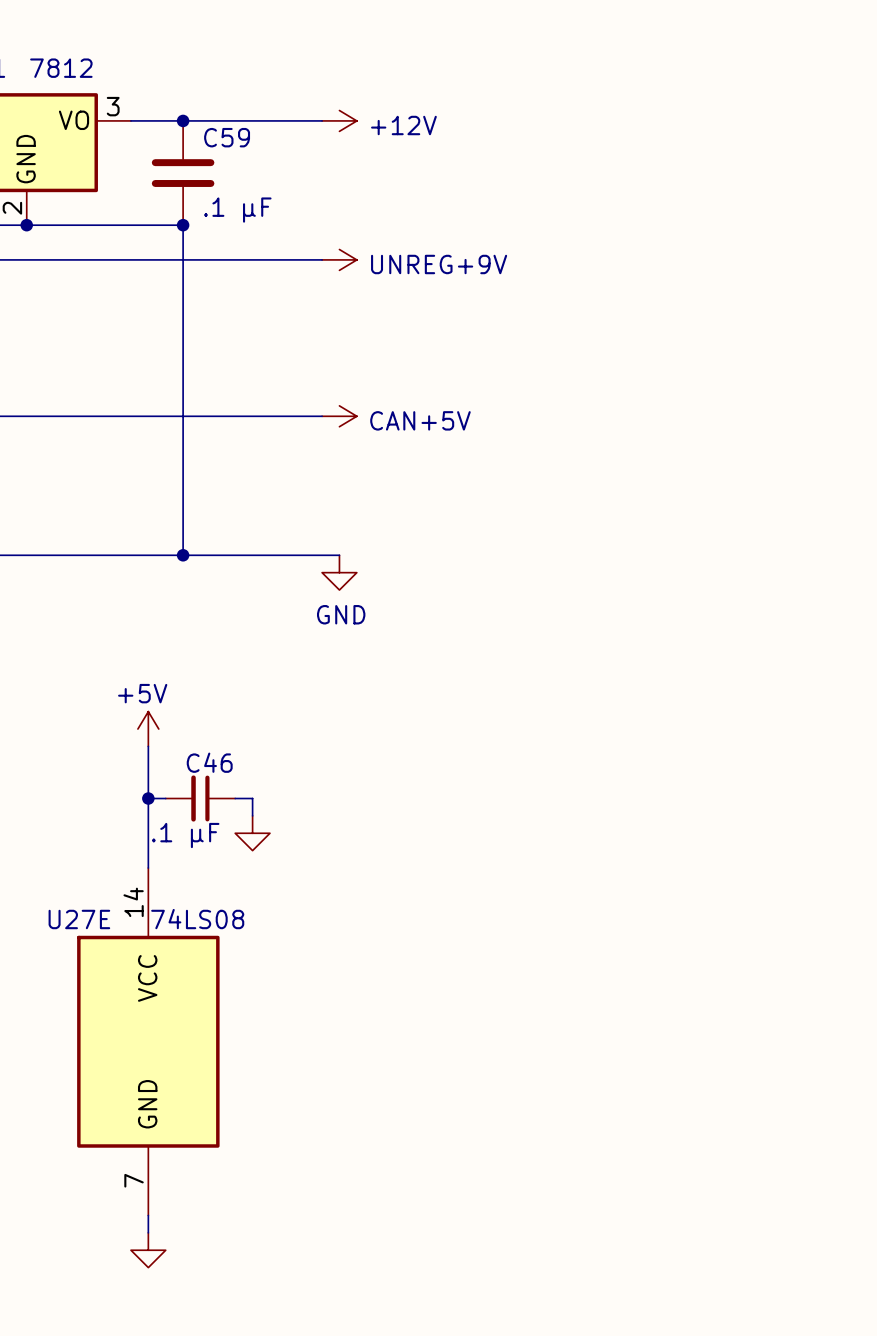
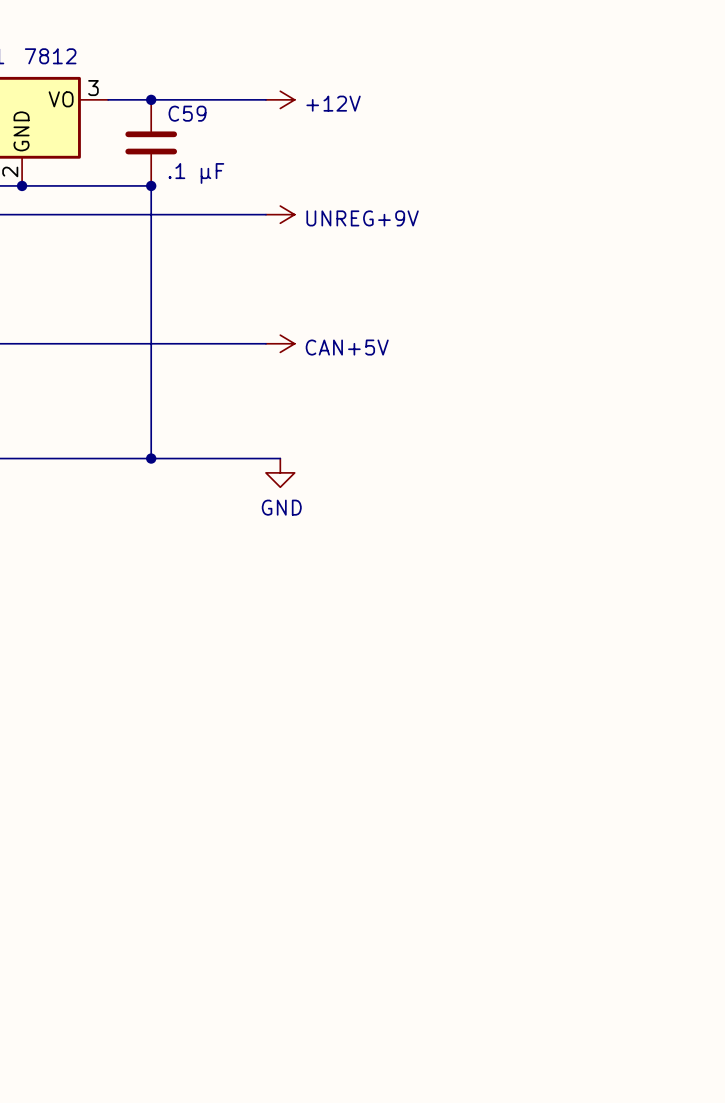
power symbol: +5V (148, 729) -> none
wire: (148, 746) (148, 868) -> none
wire: (148, 798) (165, 798) -> none
junction: (148, 798) -> none
C46: .1 μF (200, 798) -> none
wire: (235, 798) (252, 798) (252, 815) -> none
power symbol: (252, 833) -> none
U27E: 74LS08 (148, 1041) -> none
wire: (148, 1215) (148, 1232) -> none
power symbol: (148, 1250) -> none

